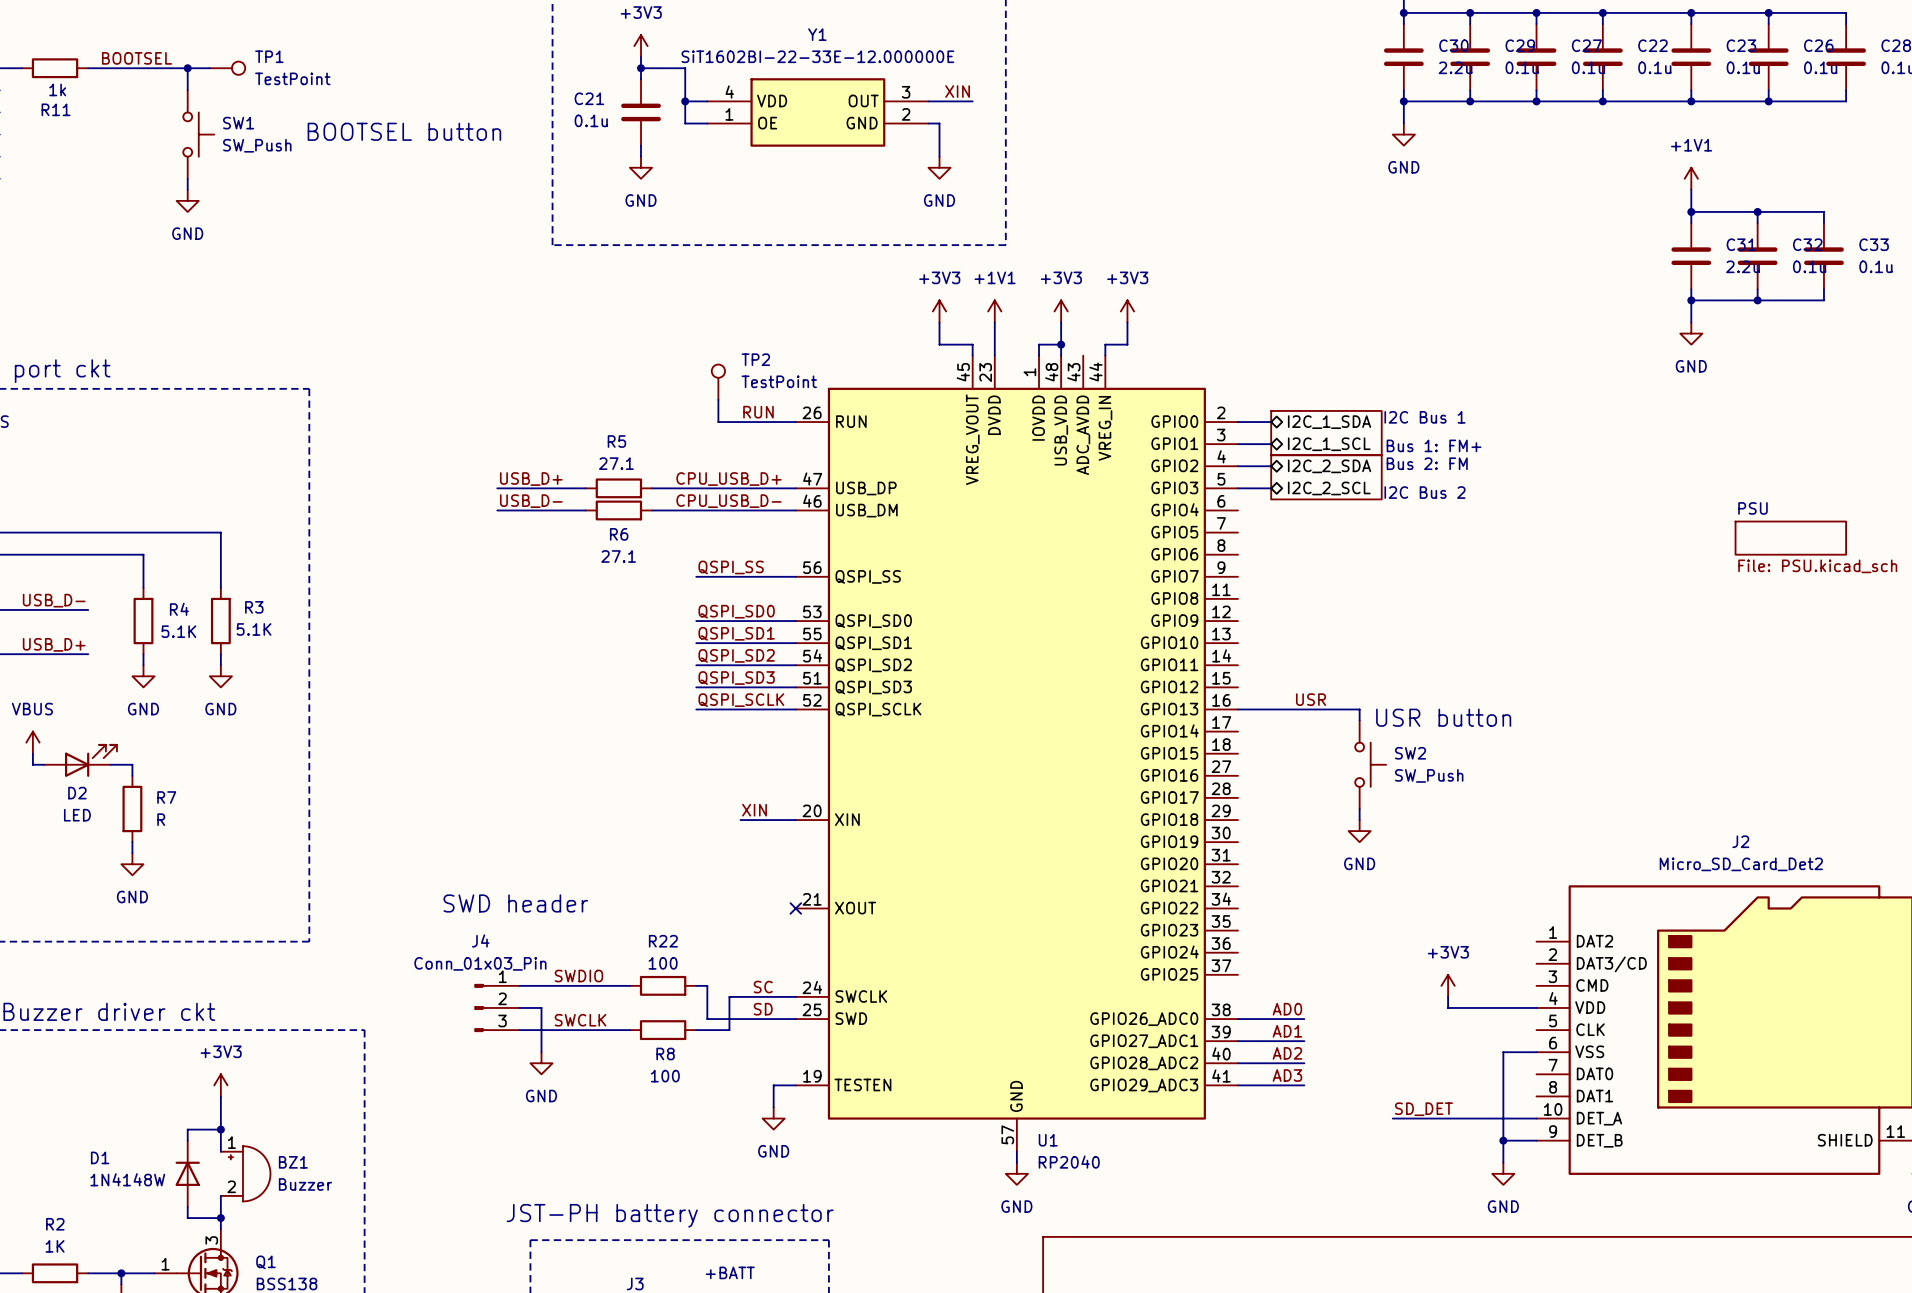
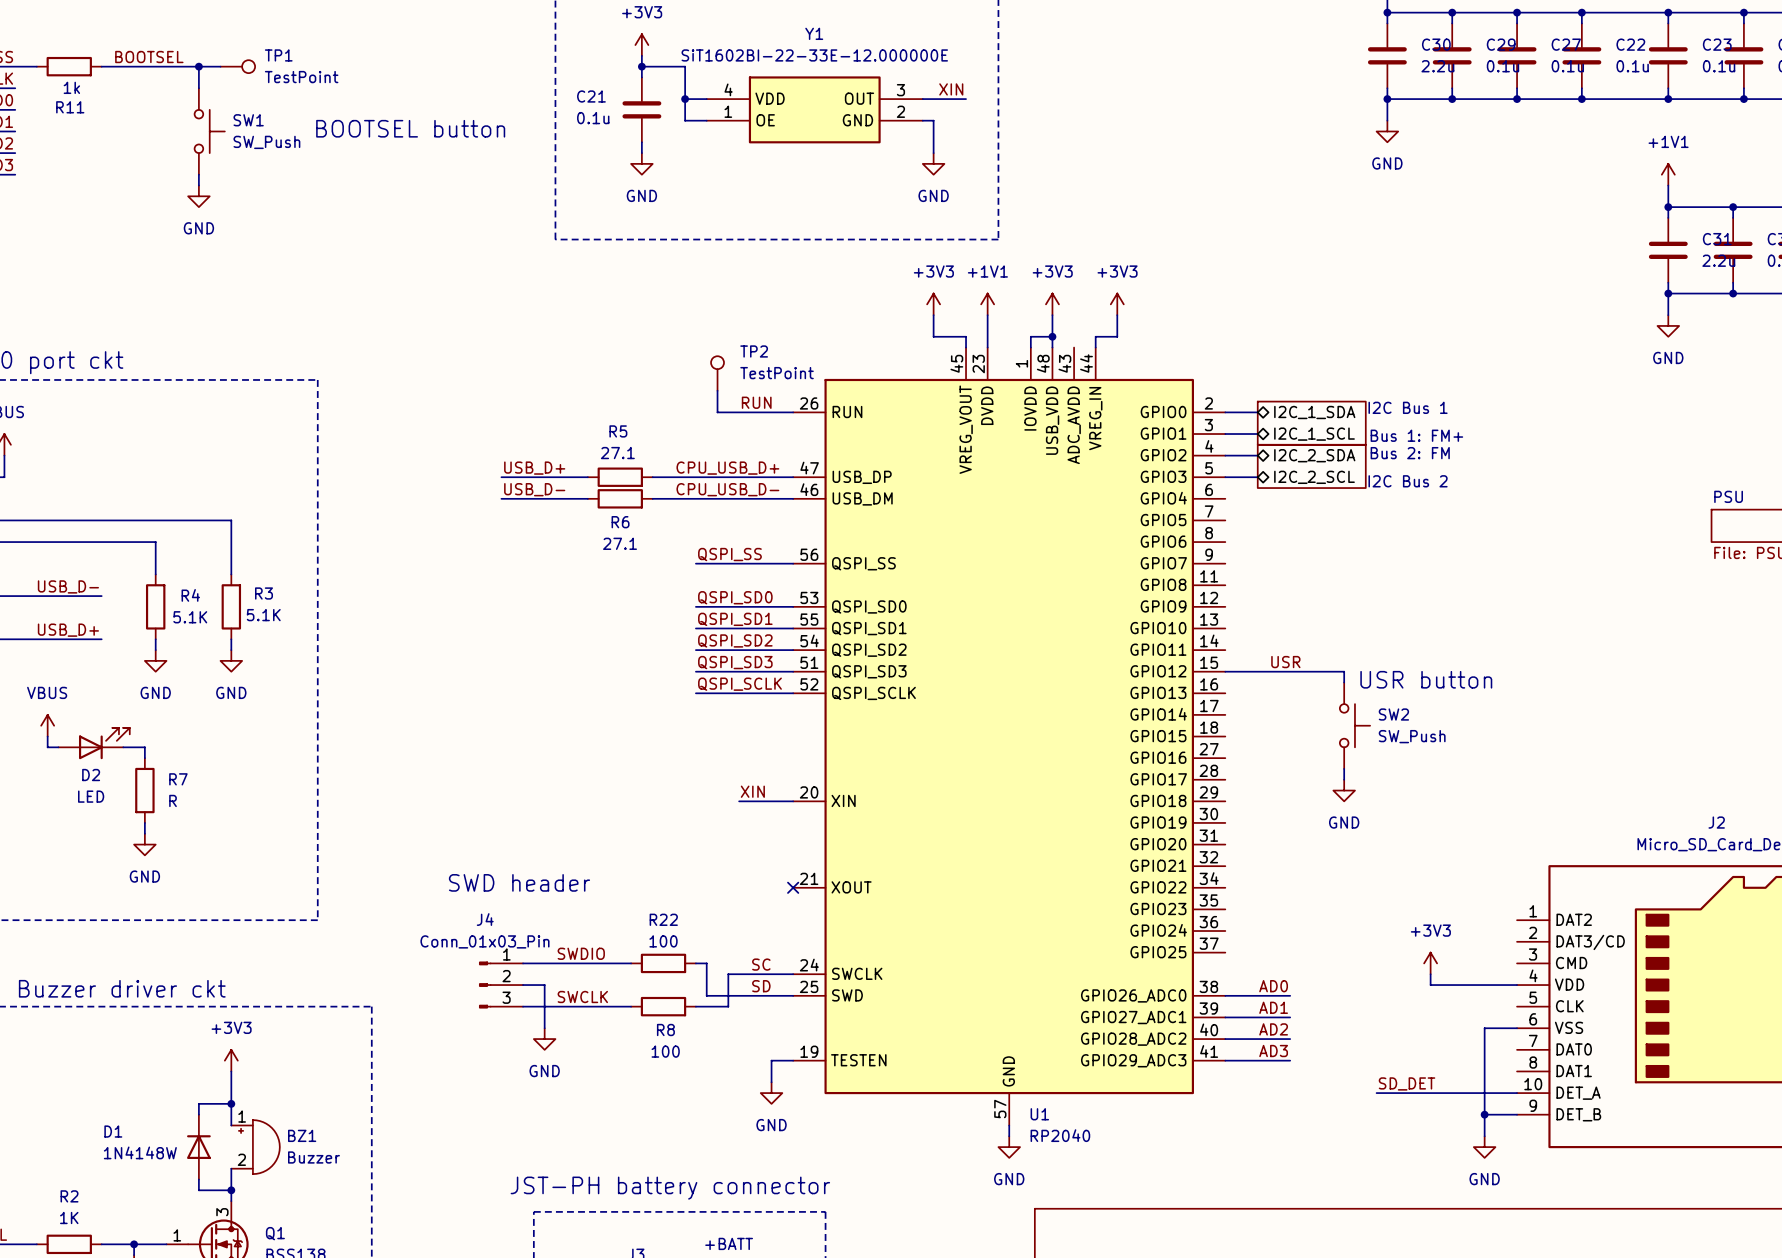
label position: USR (1311, 699) -> USR (1285, 662)
wire: (1238, 709) (1359, 709) (1359, 720) -> (1225, 671) (1344, 671) (1344, 682)
text position: USR button (1443, 717) -> USR button (1426, 679)
SW2 position: (1370, 764) -> (1354, 725)
power symbol position: GND (1359, 831) -> GND (1344, 790)

